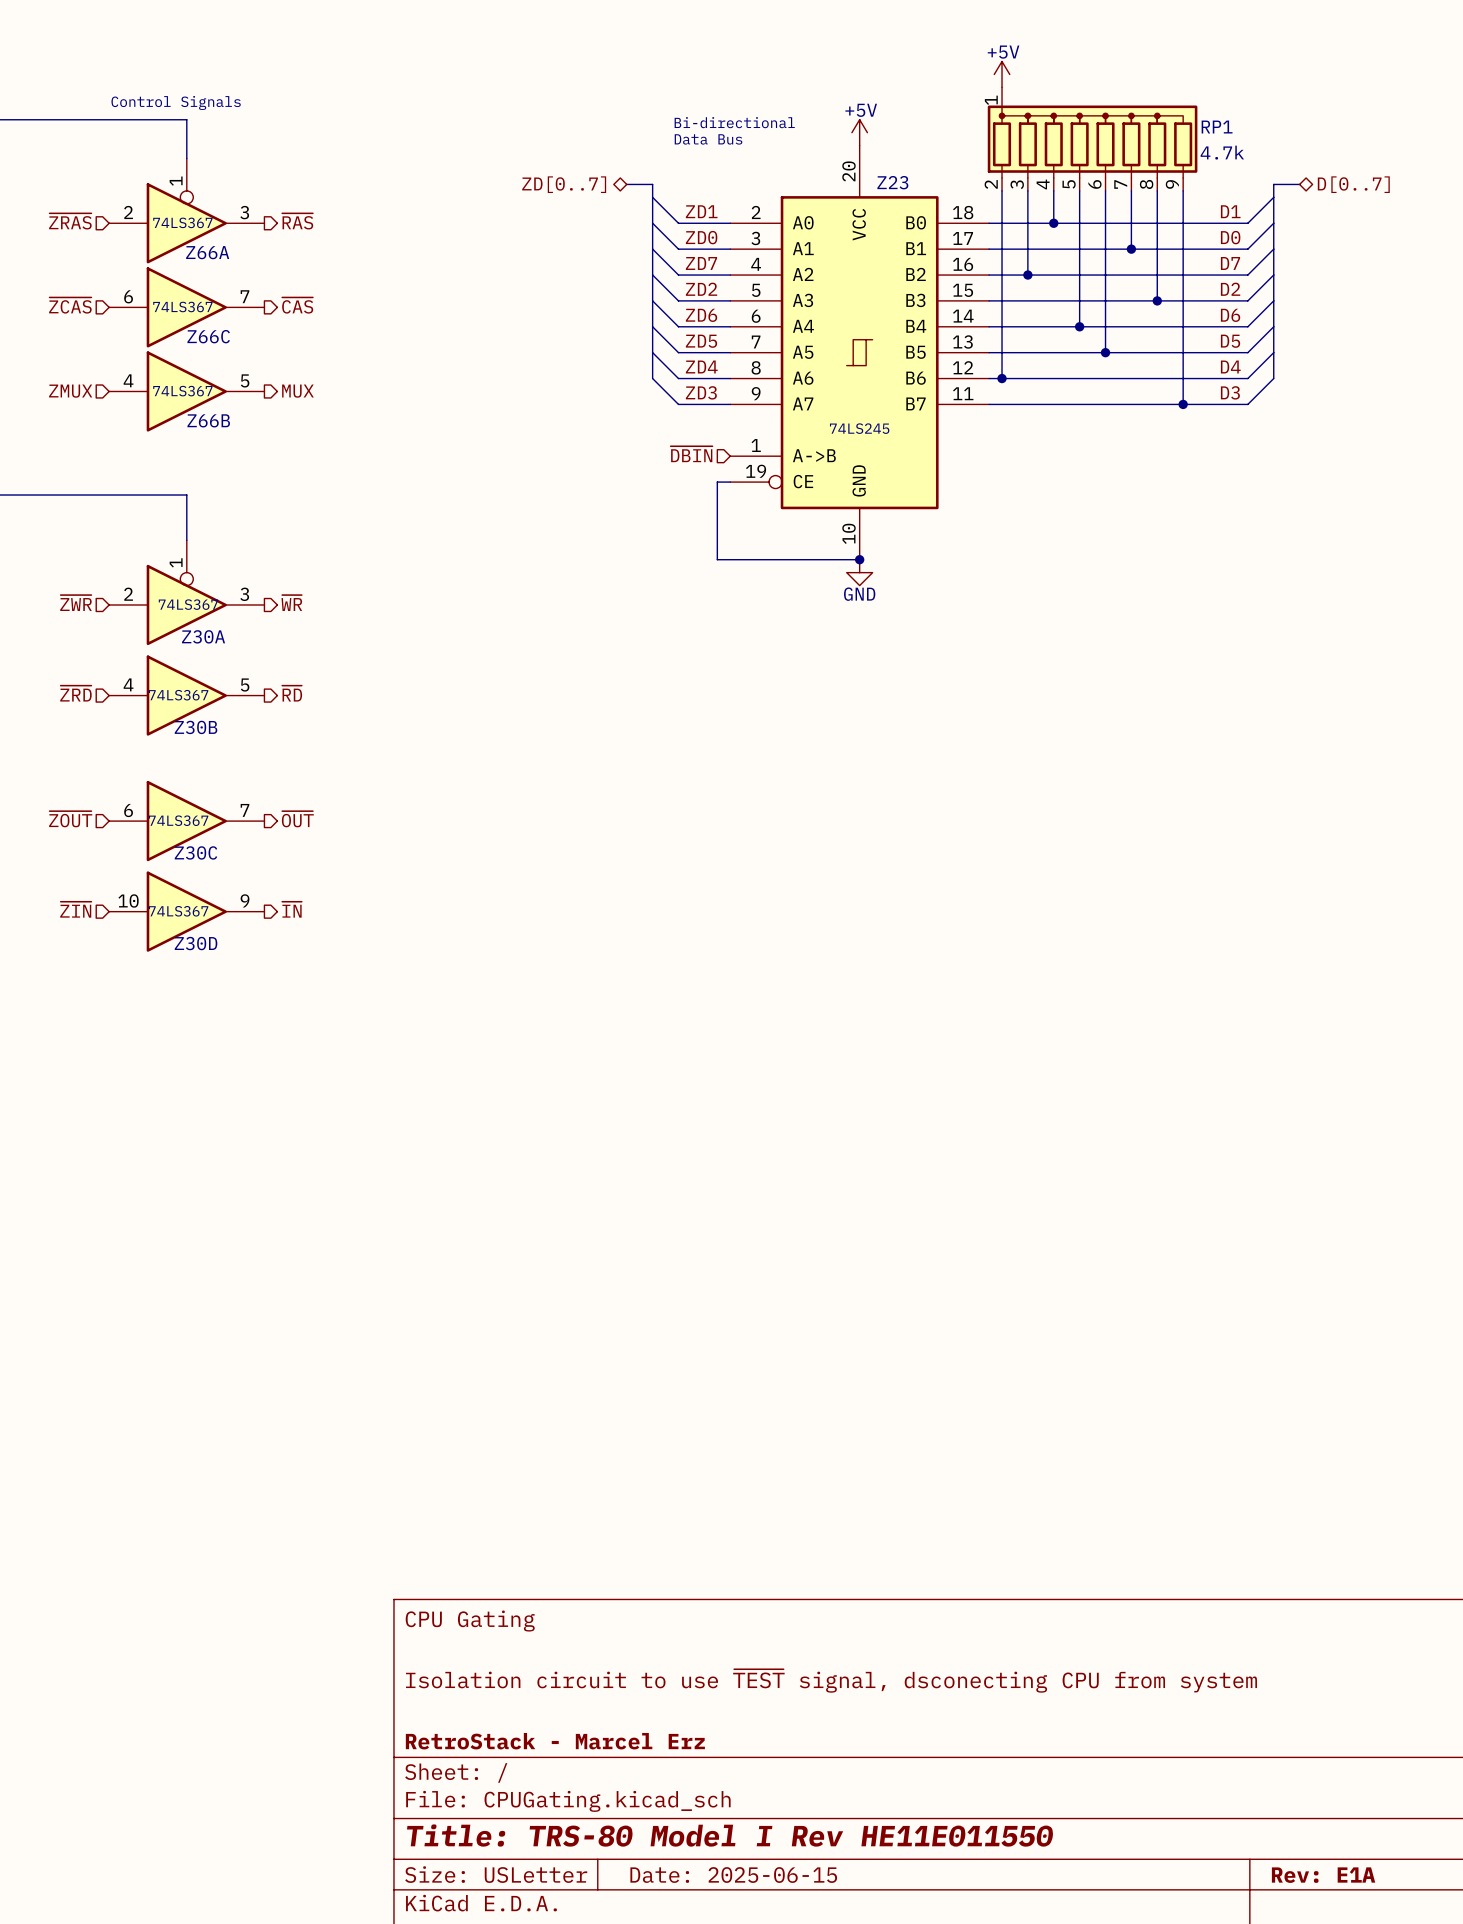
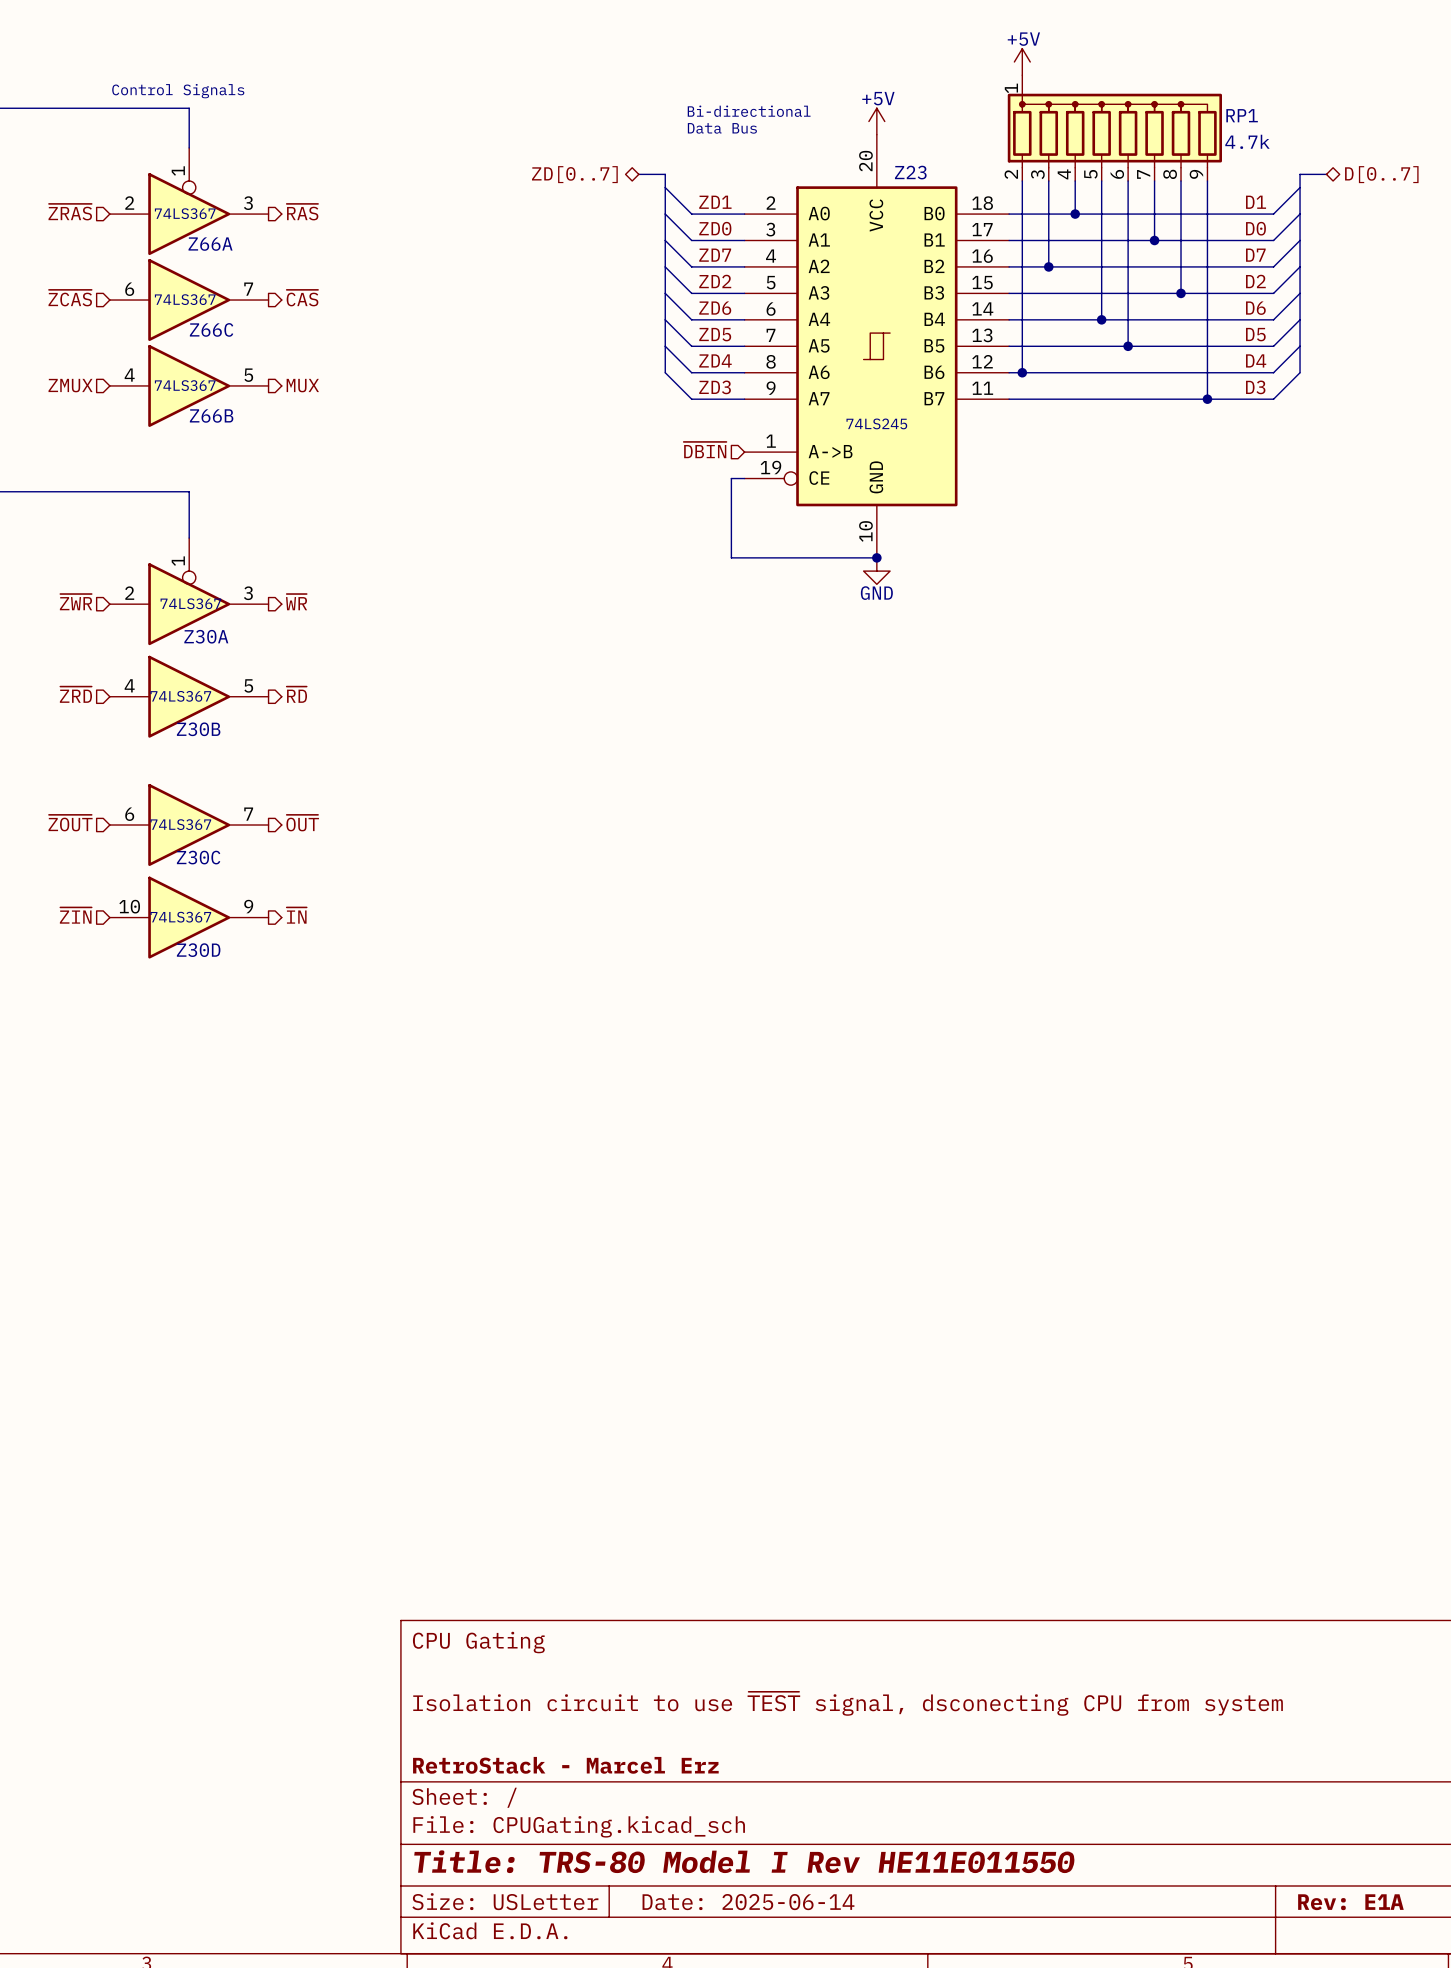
title block: Date: 2025-06-15 (733, 1875) -> Date: 2025-06-14 (748, 1902)

